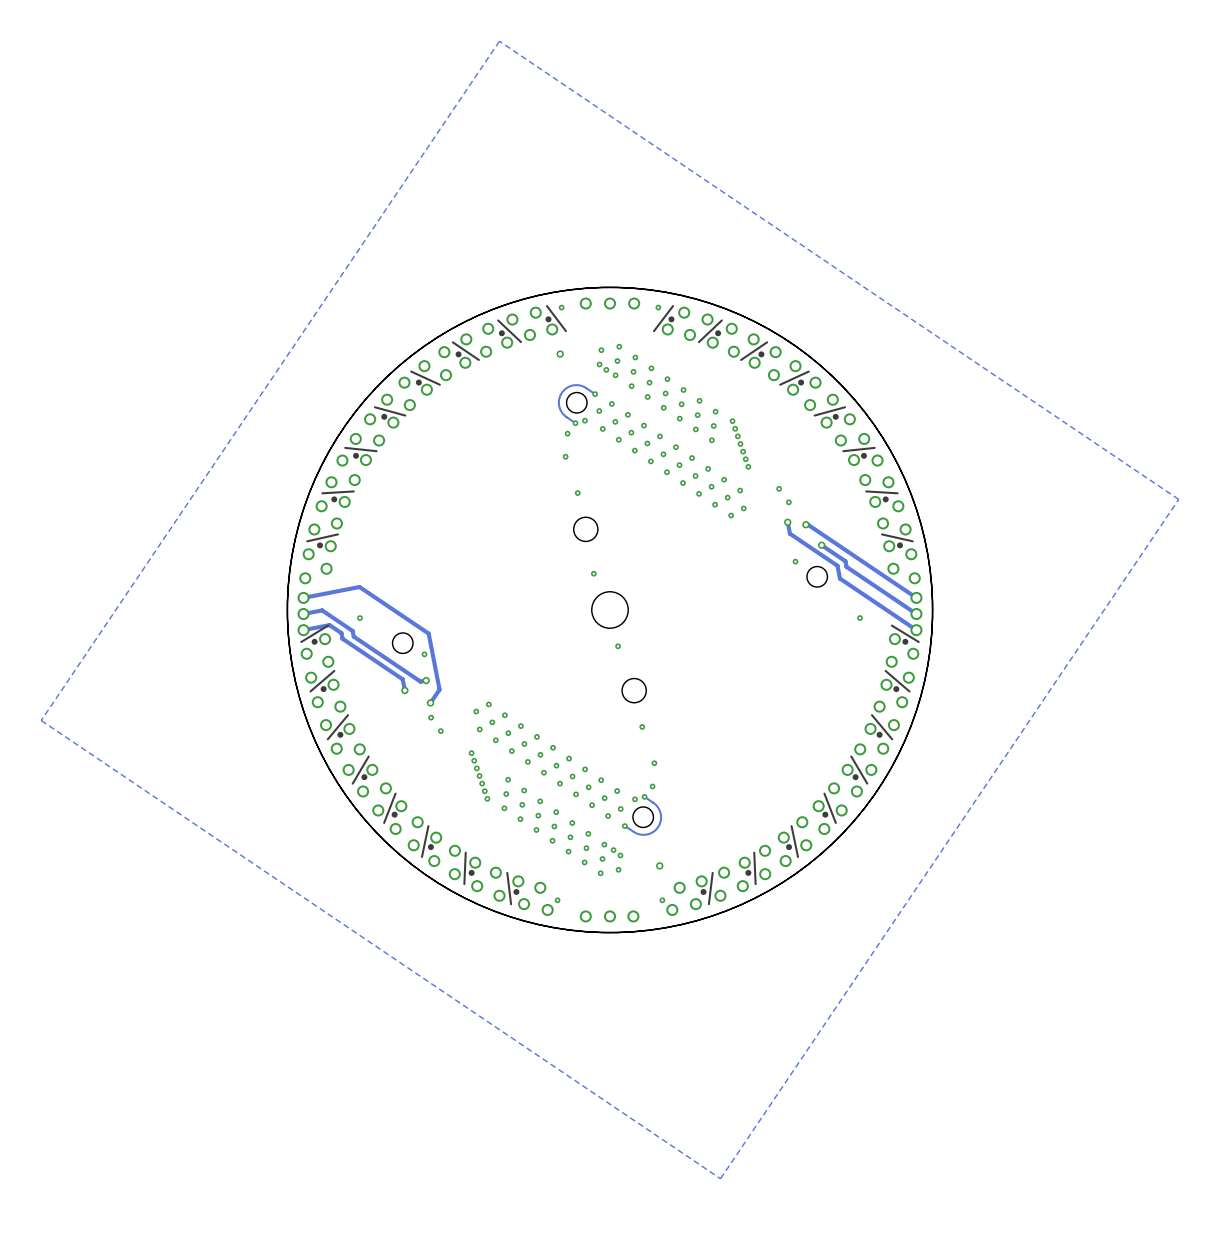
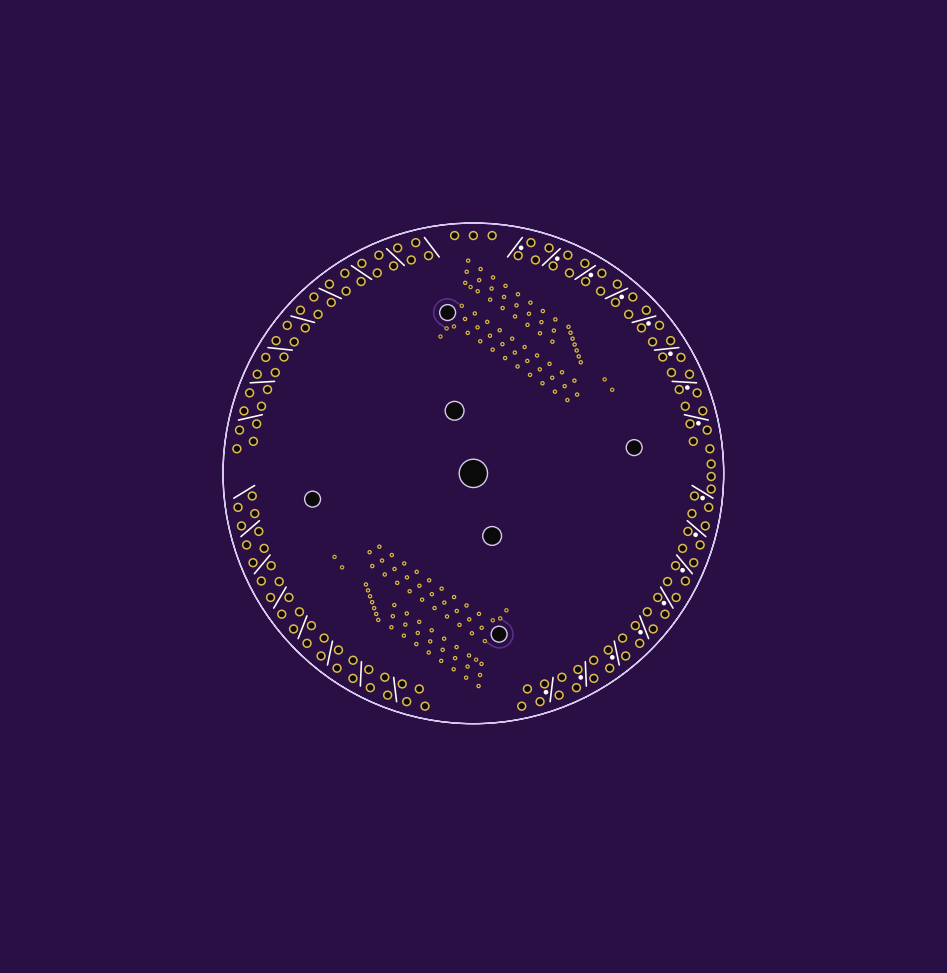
zone outline: (499, 41) (1178, 499) (720, 1178) (41, 720) (499, 41) -> none
part footprint: [506, 305, 568, 342] -> [392, 236, 441, 265]
via: (561, 307) -> none
via: (658, 307) -> none
part footprint: [460, 319, 523, 358] -> [357, 247, 406, 278]
part footprint: [418, 341, 480, 382] -> [324, 264, 373, 296]
part footprint: [596, 343, 752, 519] -> [462, 258, 584, 403]
via: (560, 354) -> none
part footprint: [381, 370, 441, 412] -> [295, 287, 343, 320]
part footprint: [349, 406, 407, 447] -> [271, 315, 316, 347]
part footprint: [325, 446, 378, 489] -> [252, 346, 294, 379]
via: (565, 456) -> none
part footprint: [308, 490, 355, 536] -> [239, 380, 276, 416]
via: (577, 493) -> none
track: (787, 522) (789, 533) (837, 565) (839, 578) (916, 630) -> none
via: (787, 522) -> none
track: (805, 524) (916, 597) -> none
via: (805, 524) -> none
part footprint: [299, 533, 340, 585] -> [232, 413, 264, 454]
track: (821, 545) (845, 561) (846, 566) (916, 614) -> none
via: (821, 545) -> none
via: (795, 561) -> none
via: (593, 573) -> none
track: (303, 597) (359, 587) (428, 633) (439, 689) (430, 702) -> none
part: (303, 597) -> none
track: (303, 614) (322, 610) (352, 630) (353, 636) (420, 681) (426, 680) -> none
part: (303, 614) -> none
via: (359, 618) -> none
via: (860, 618) -> none
part footprint: [300, 624, 335, 684] -> [232, 484, 260, 531]
track: (303, 630) (329, 625) (341, 633) (342, 638) (402, 679) (404, 690) -> none
part: (303, 630) -> none
via: (618, 646) -> none
via: (424, 654) -> none
part footprint: [309, 669, 347, 732] -> [240, 519, 269, 568]
via: (426, 680) -> none
via: (404, 690) -> none
part footprint: [468, 701, 624, 877] -> [363, 544, 484, 689]
via: (430, 702) -> none
part footprint: [326, 714, 366, 776] -> [253, 554, 284, 603]
via: (642, 726) -> none
part footprint: [351, 755, 392, 817] -> [272, 586, 305, 634]
via: (654, 763) -> none
part footprint: [383, 792, 424, 852] -> [297, 615, 329, 661]
part footprint: [420, 825, 461, 881] -> [326, 640, 358, 684]
part footprint: [463, 851, 506, 902] -> [359, 660, 393, 700]
via: (659, 865) -> none
part footprint: [506, 871, 554, 917] -> [392, 676, 430, 711]
via: (557, 900) -> none
via: (662, 900) -> none
part: (585, 916) -> none
part: (609, 916) -> none
part: (633, 916) -> none

